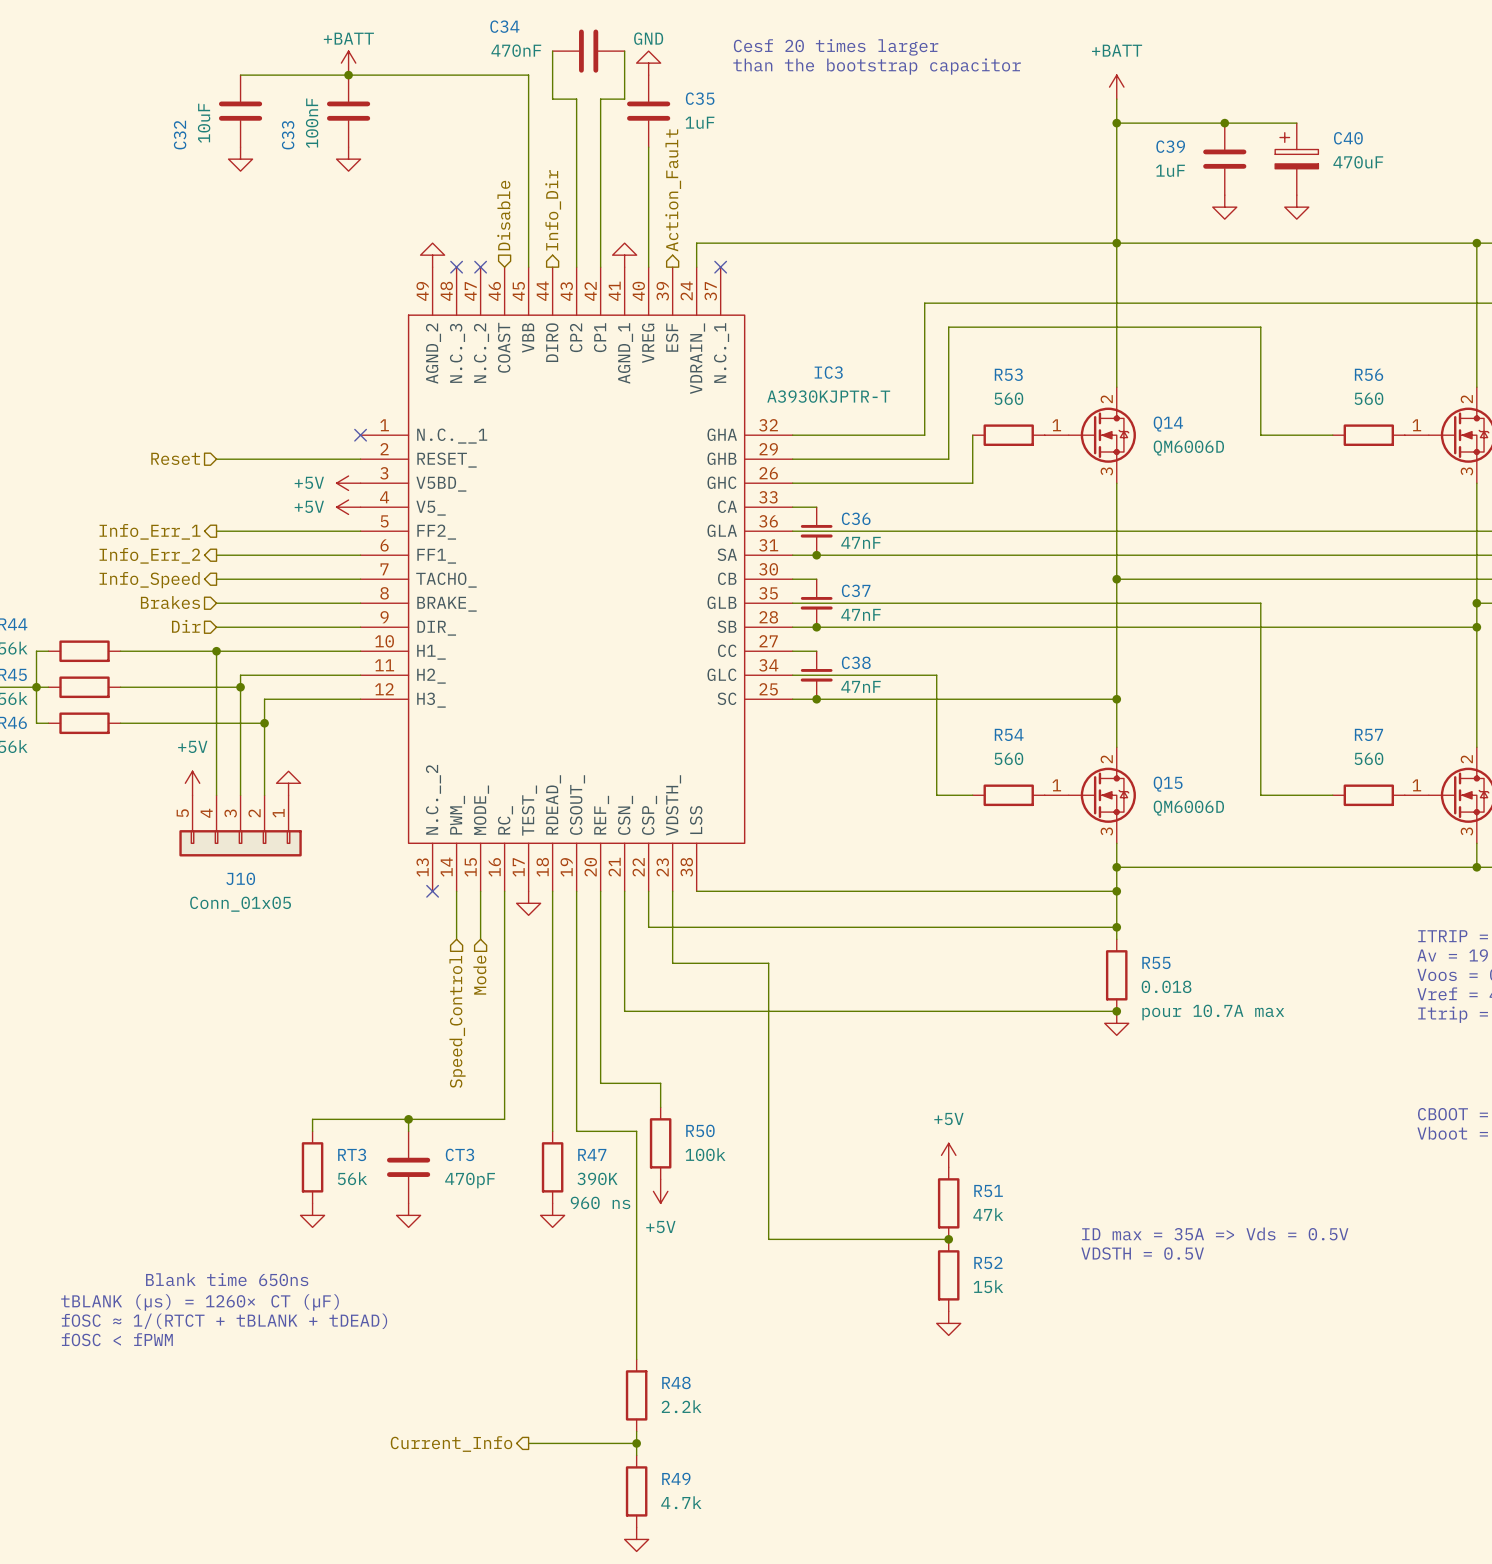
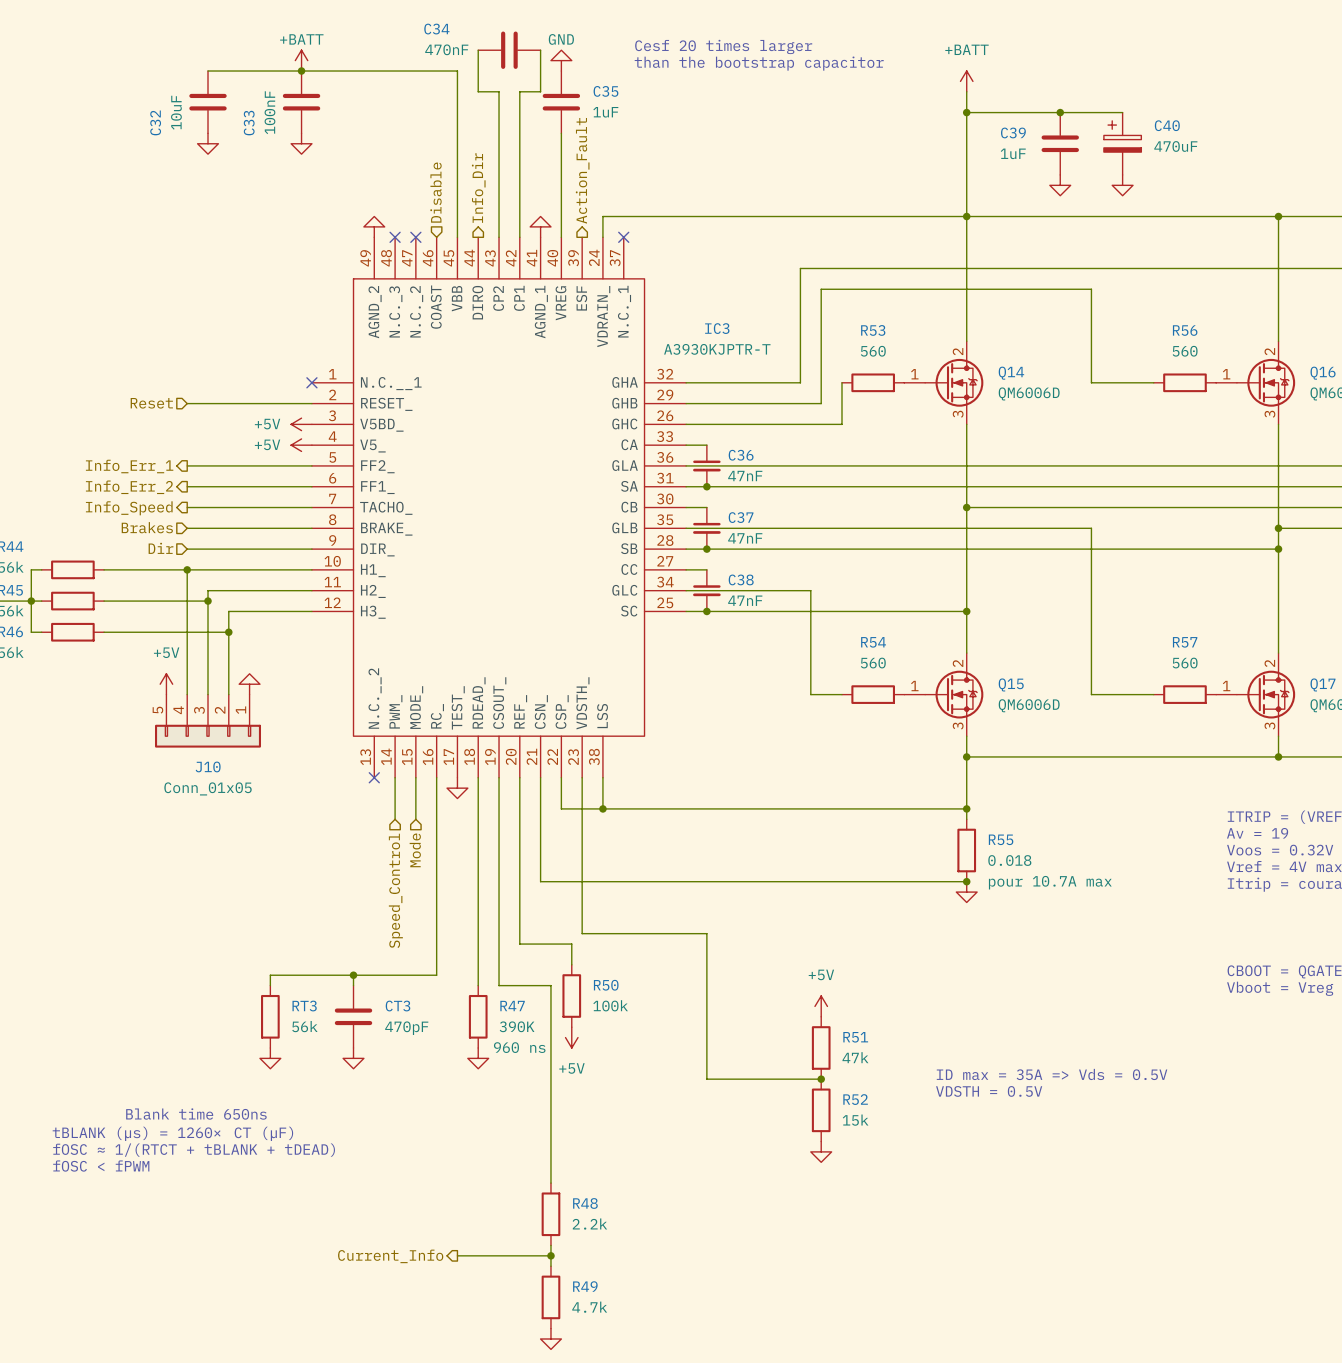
wire: (696, 891) (1116, 891) -> (602, 777) (602, 808)
junction: (1116, 891) -> none
junction: none -> (602, 808)
wire: (672, 963) (768, 963) (768, 1239) (816, 1239) -> (582, 840) (582, 933) (706, 933) (706, 1079)

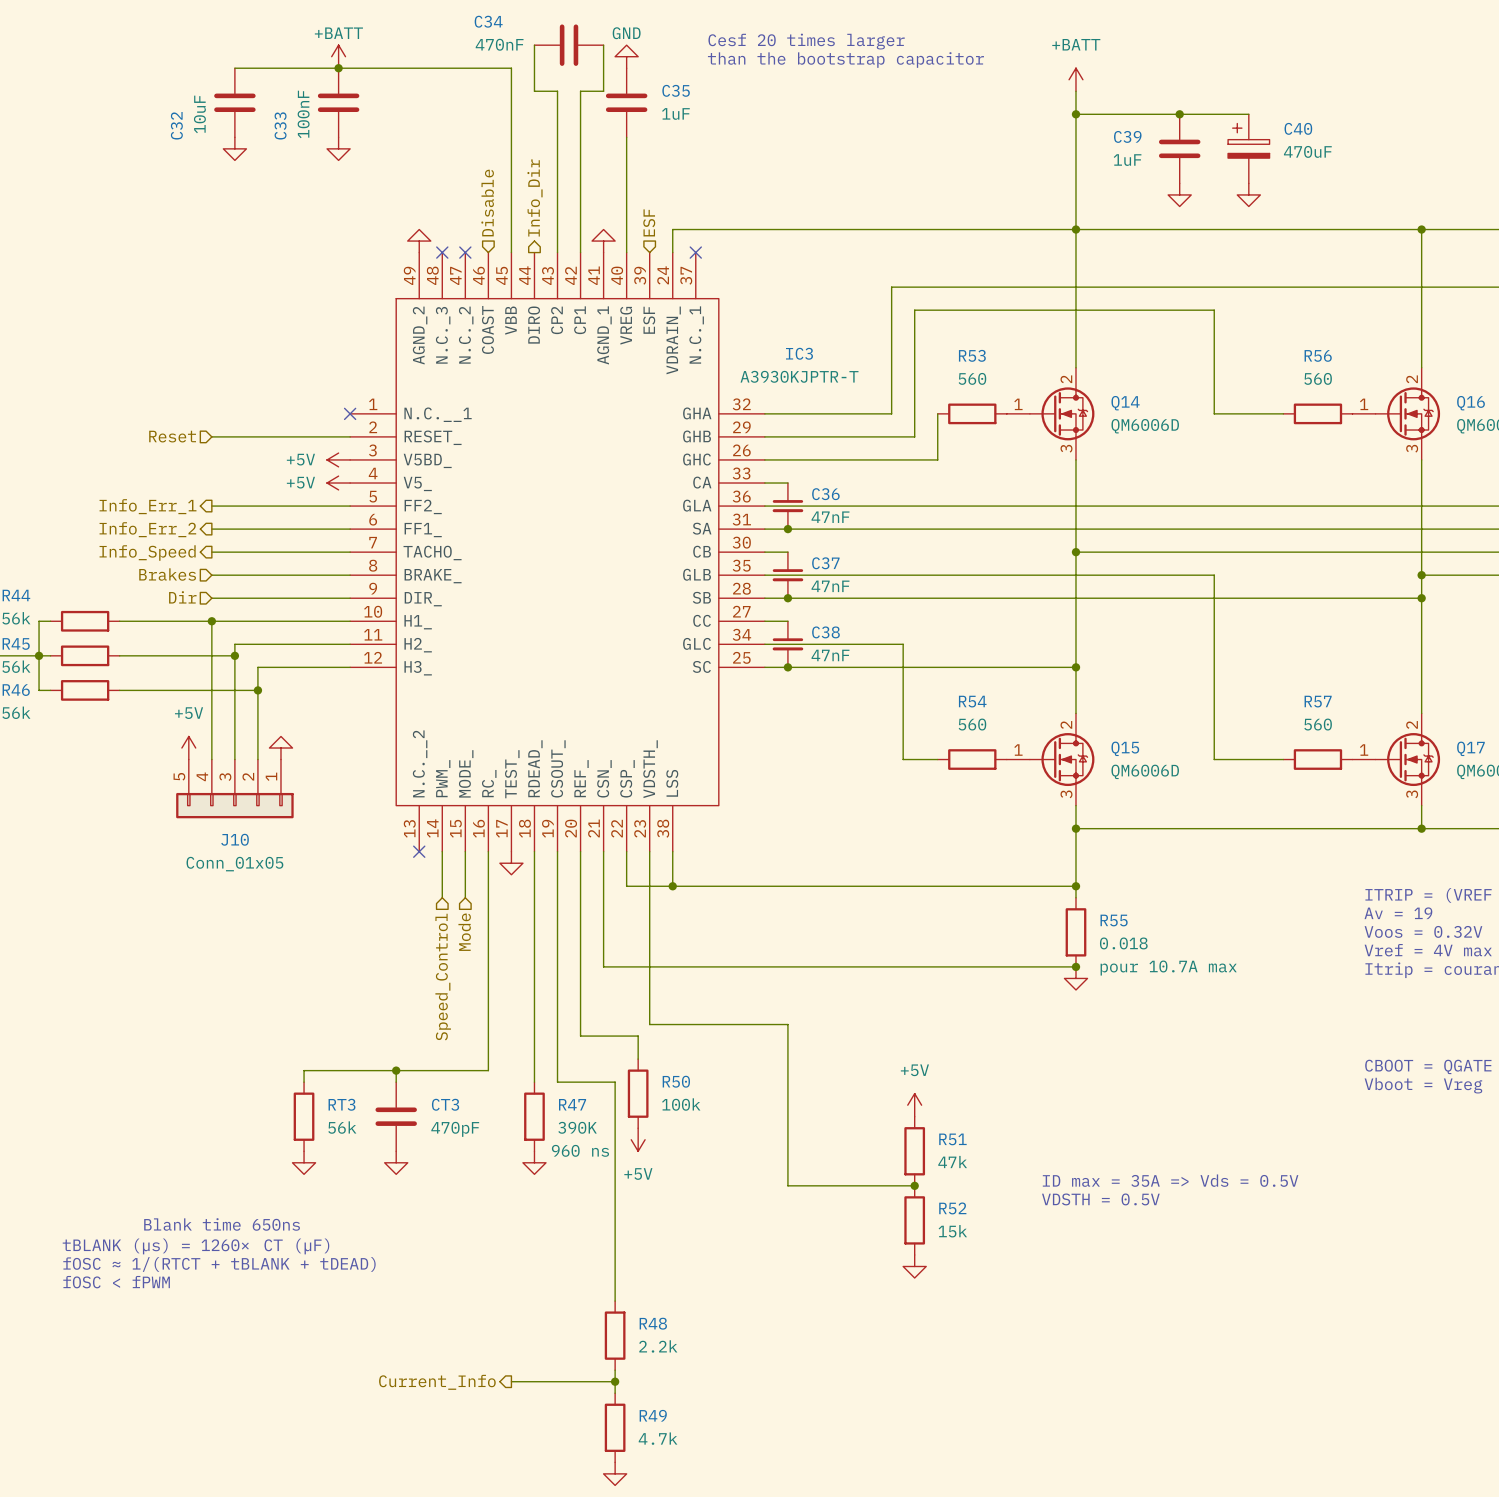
hierarchical label shape: output (582, 170) -> input (649, 222)
hierarchical label: Action_Fault (582, 170) -> ESF (649, 222)

